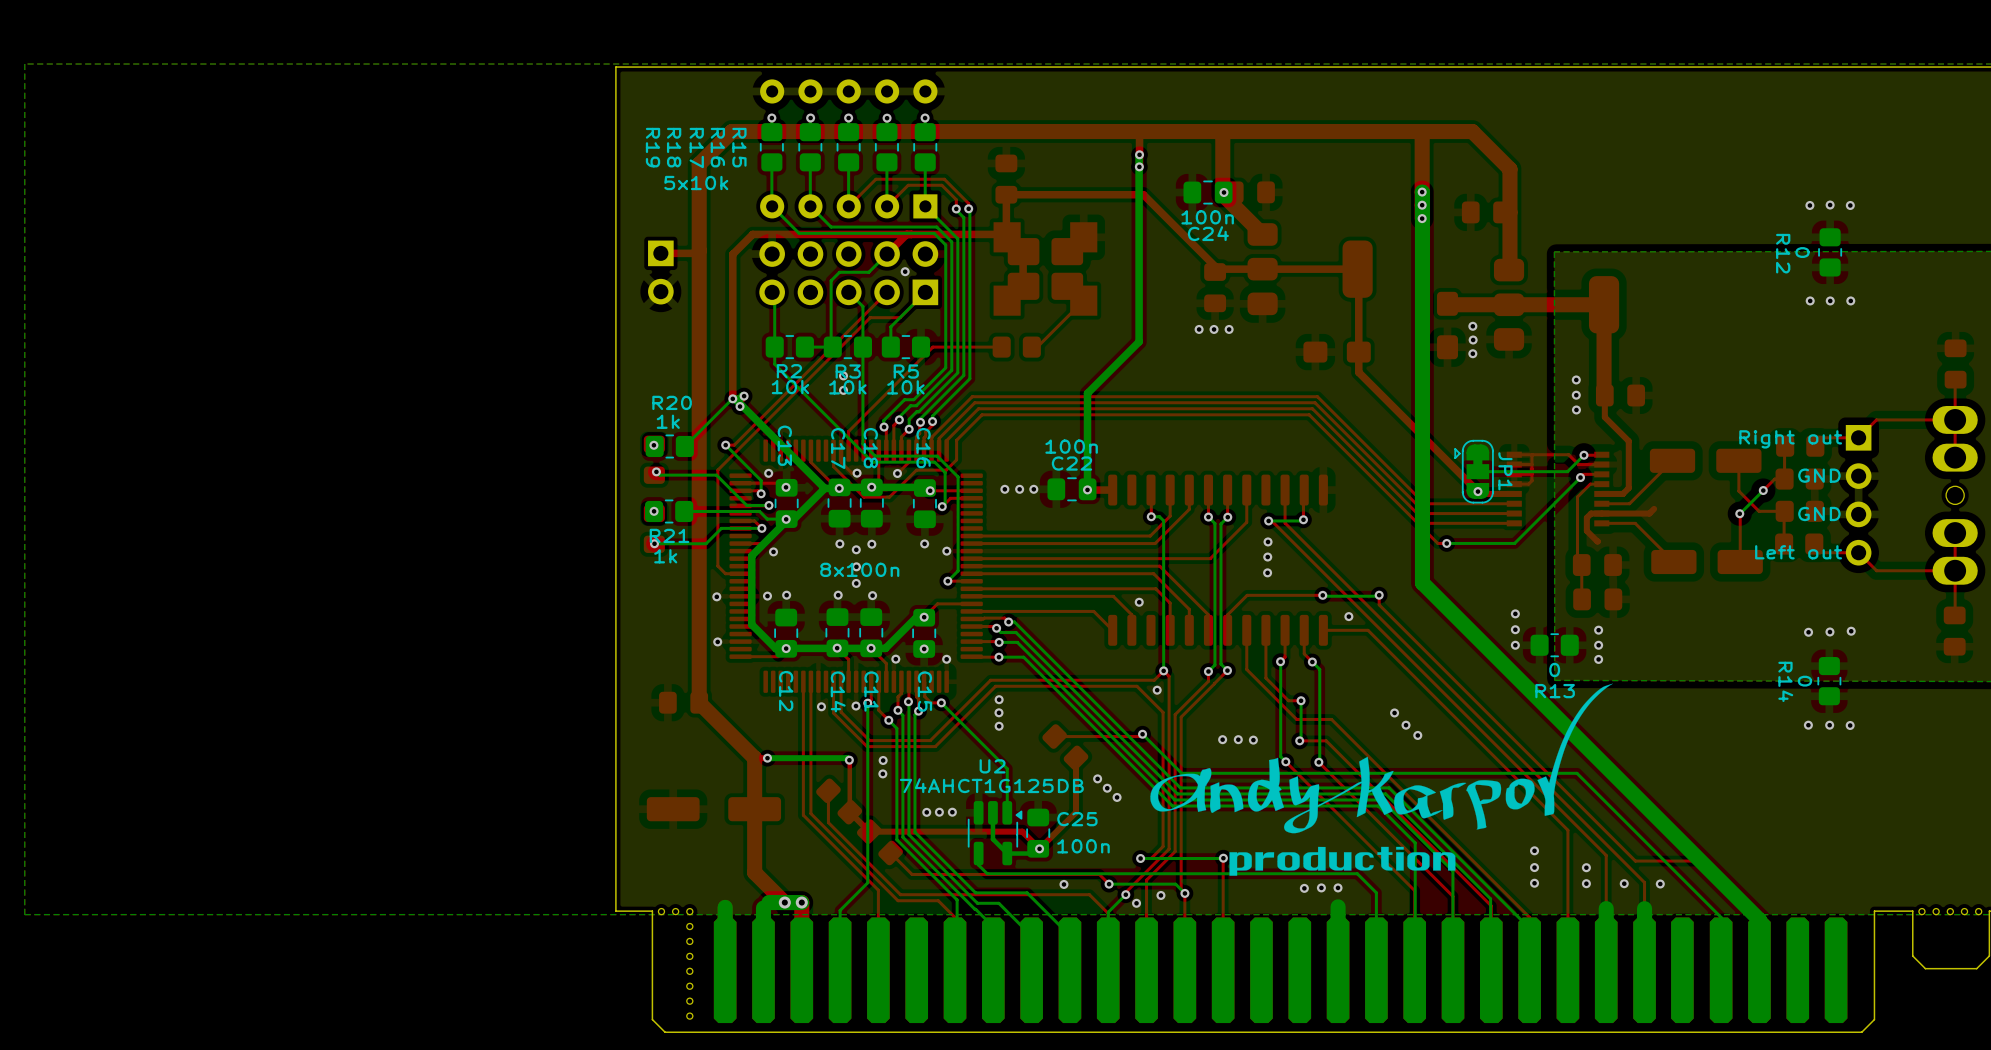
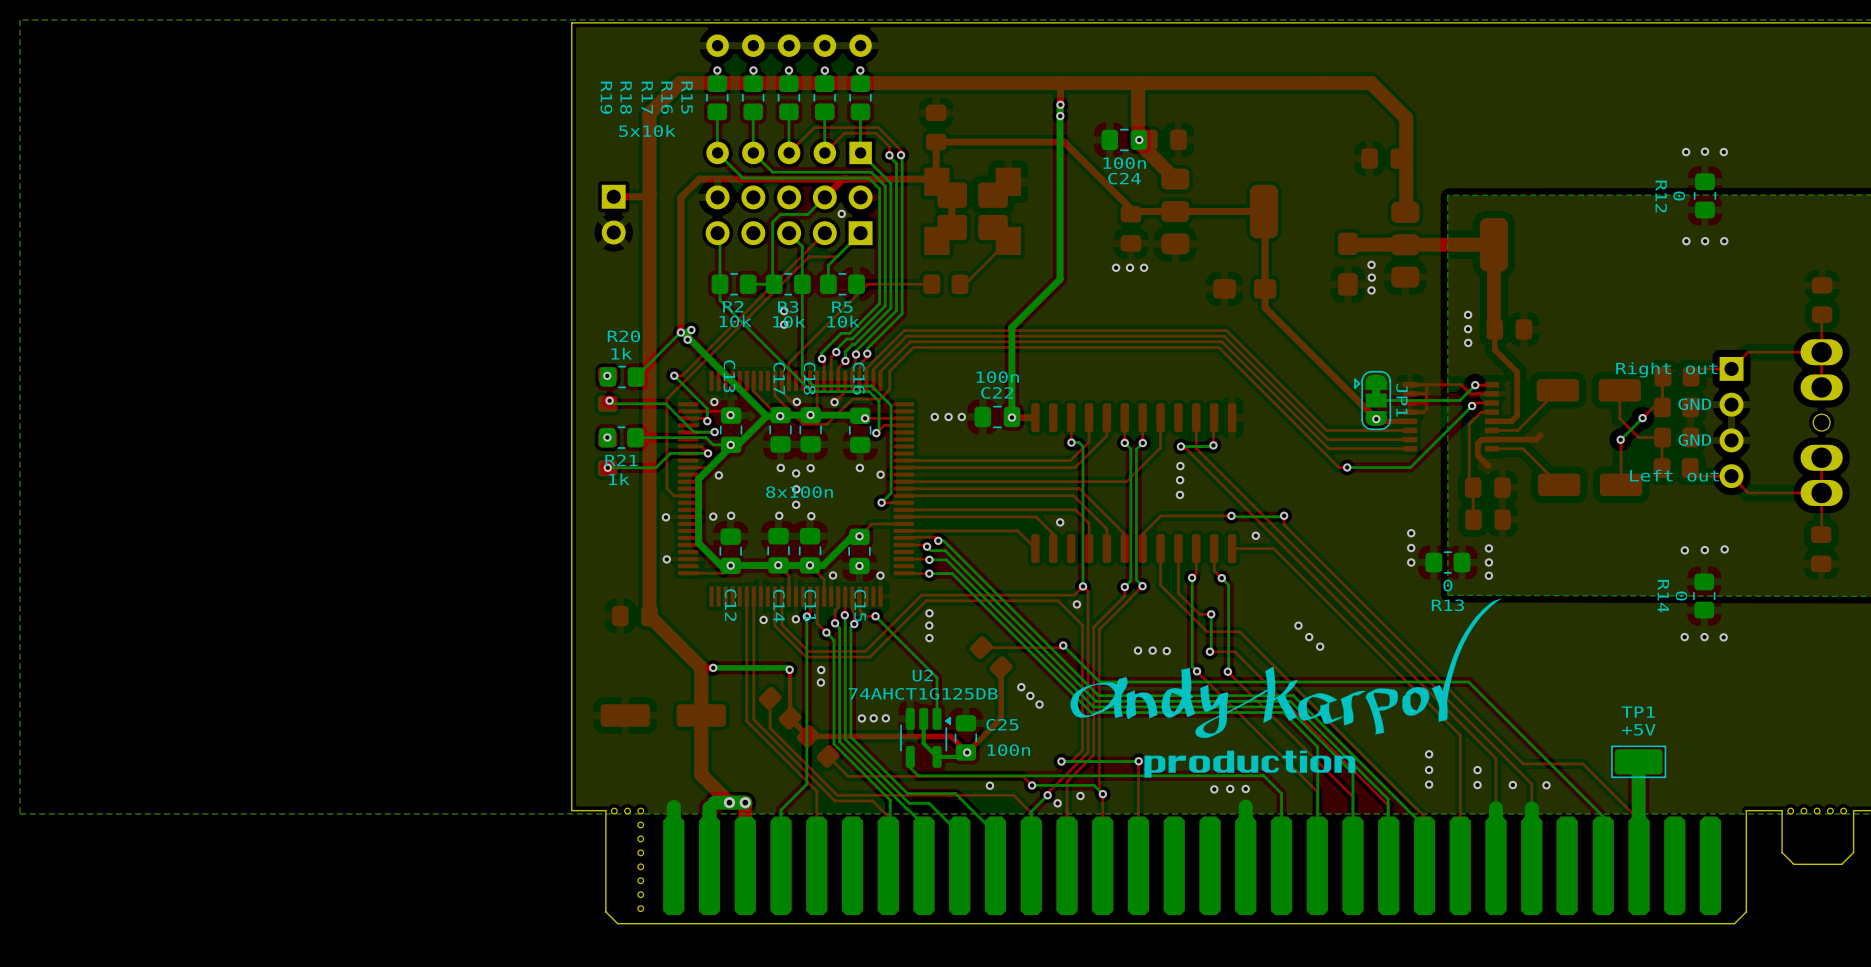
top track: (1422, 131) (1422, 218) -> none
bottom track: (1422, 192) (1422, 582) (1759, 919) -> (1638, 768) (1638, 818)
via: (1422, 192) -> none
via: (1422, 205) -> none
via: (1422, 218) -> none
TP1: none -> +5V (1638, 761)

